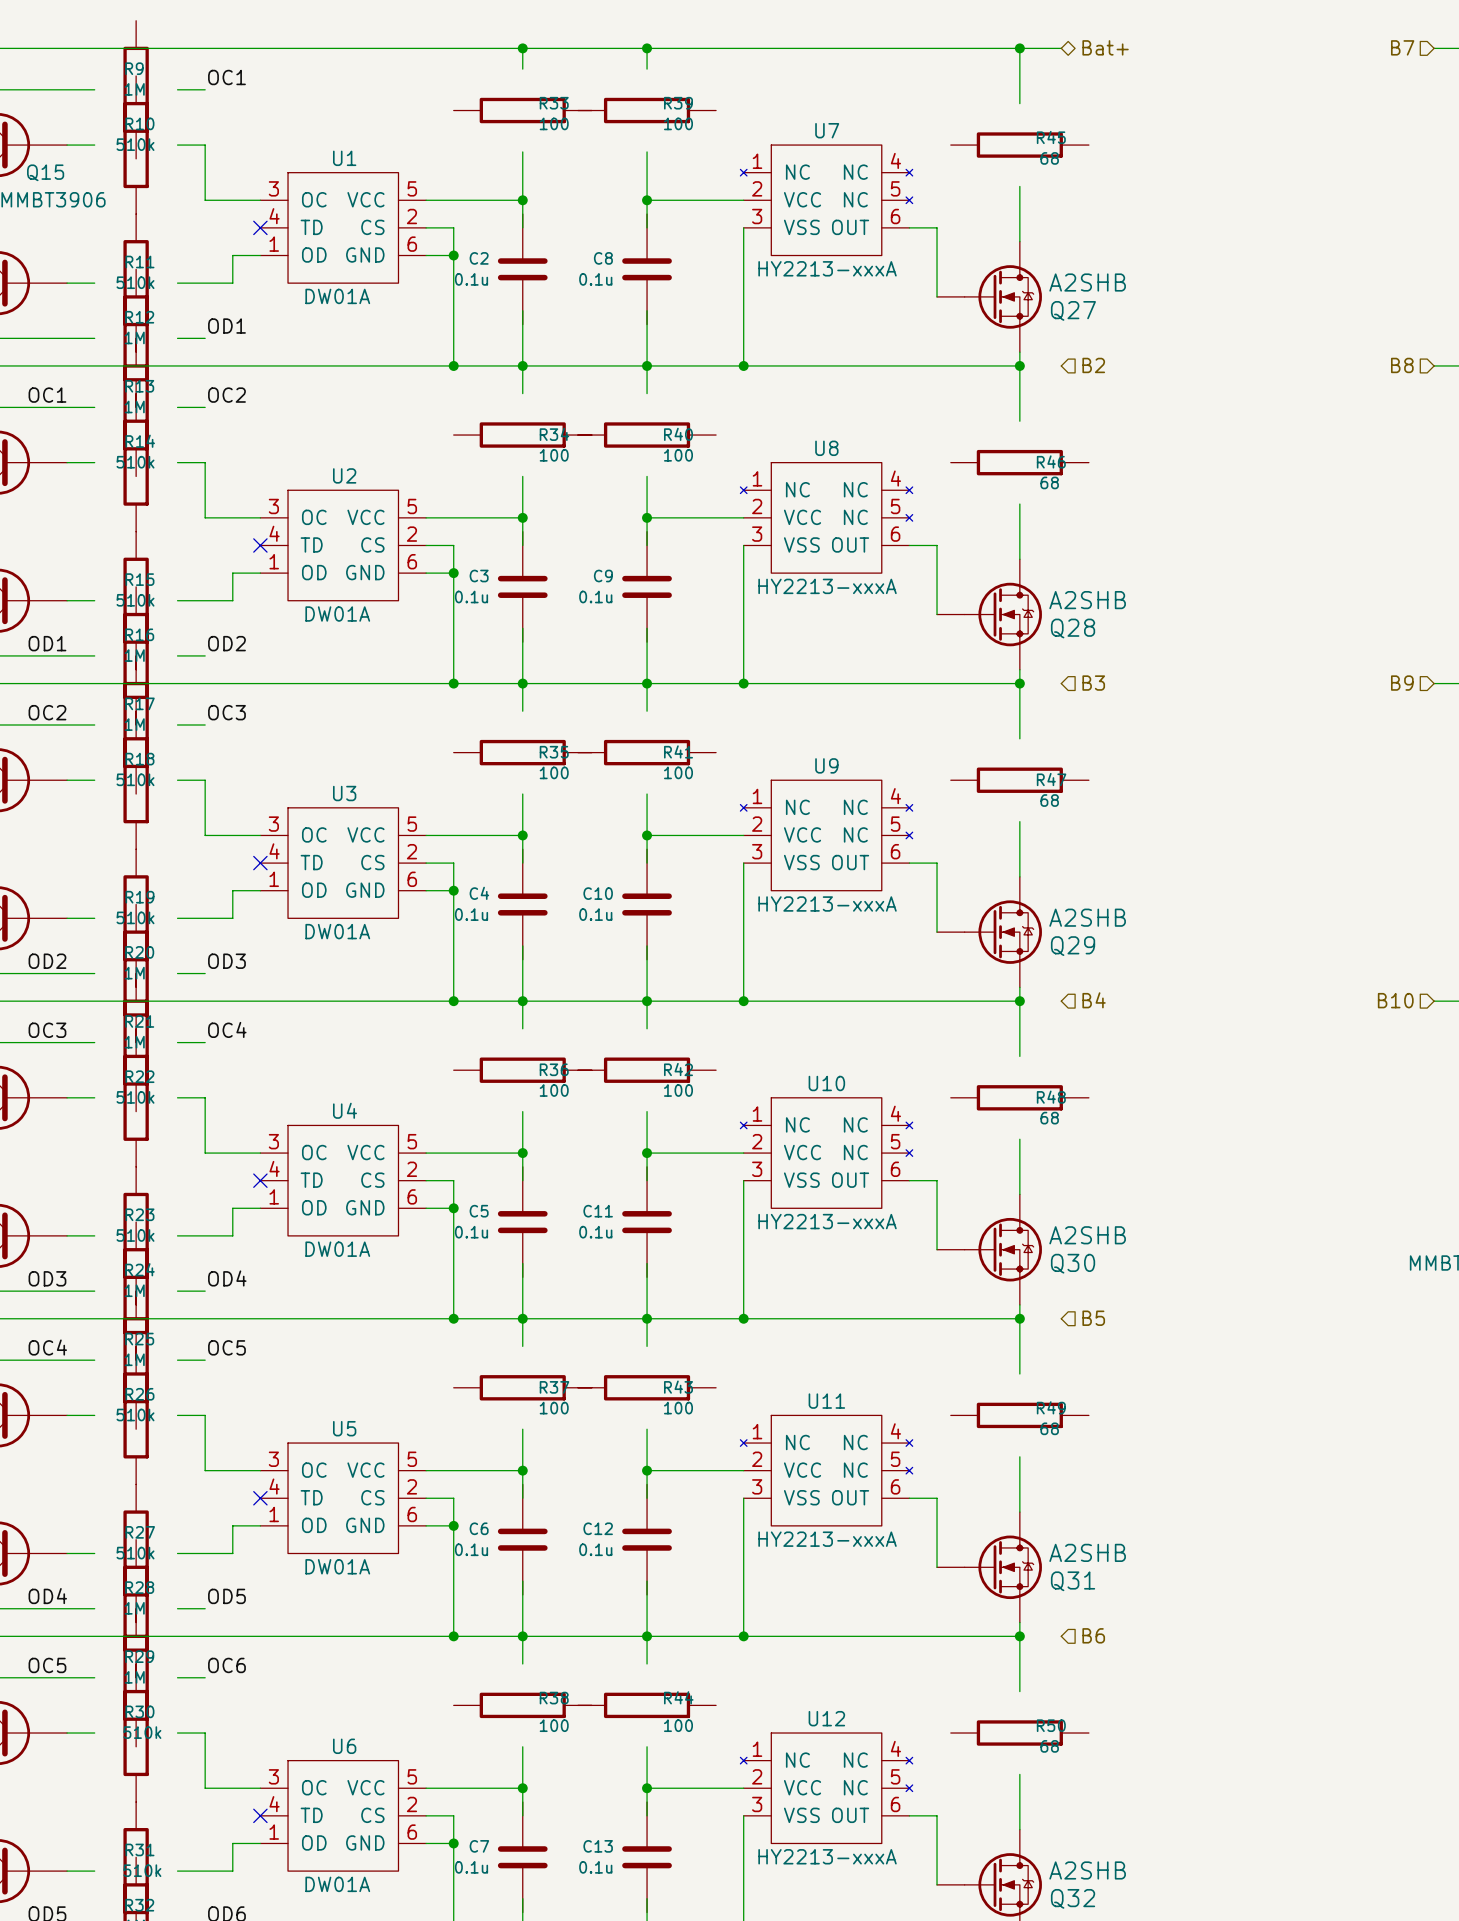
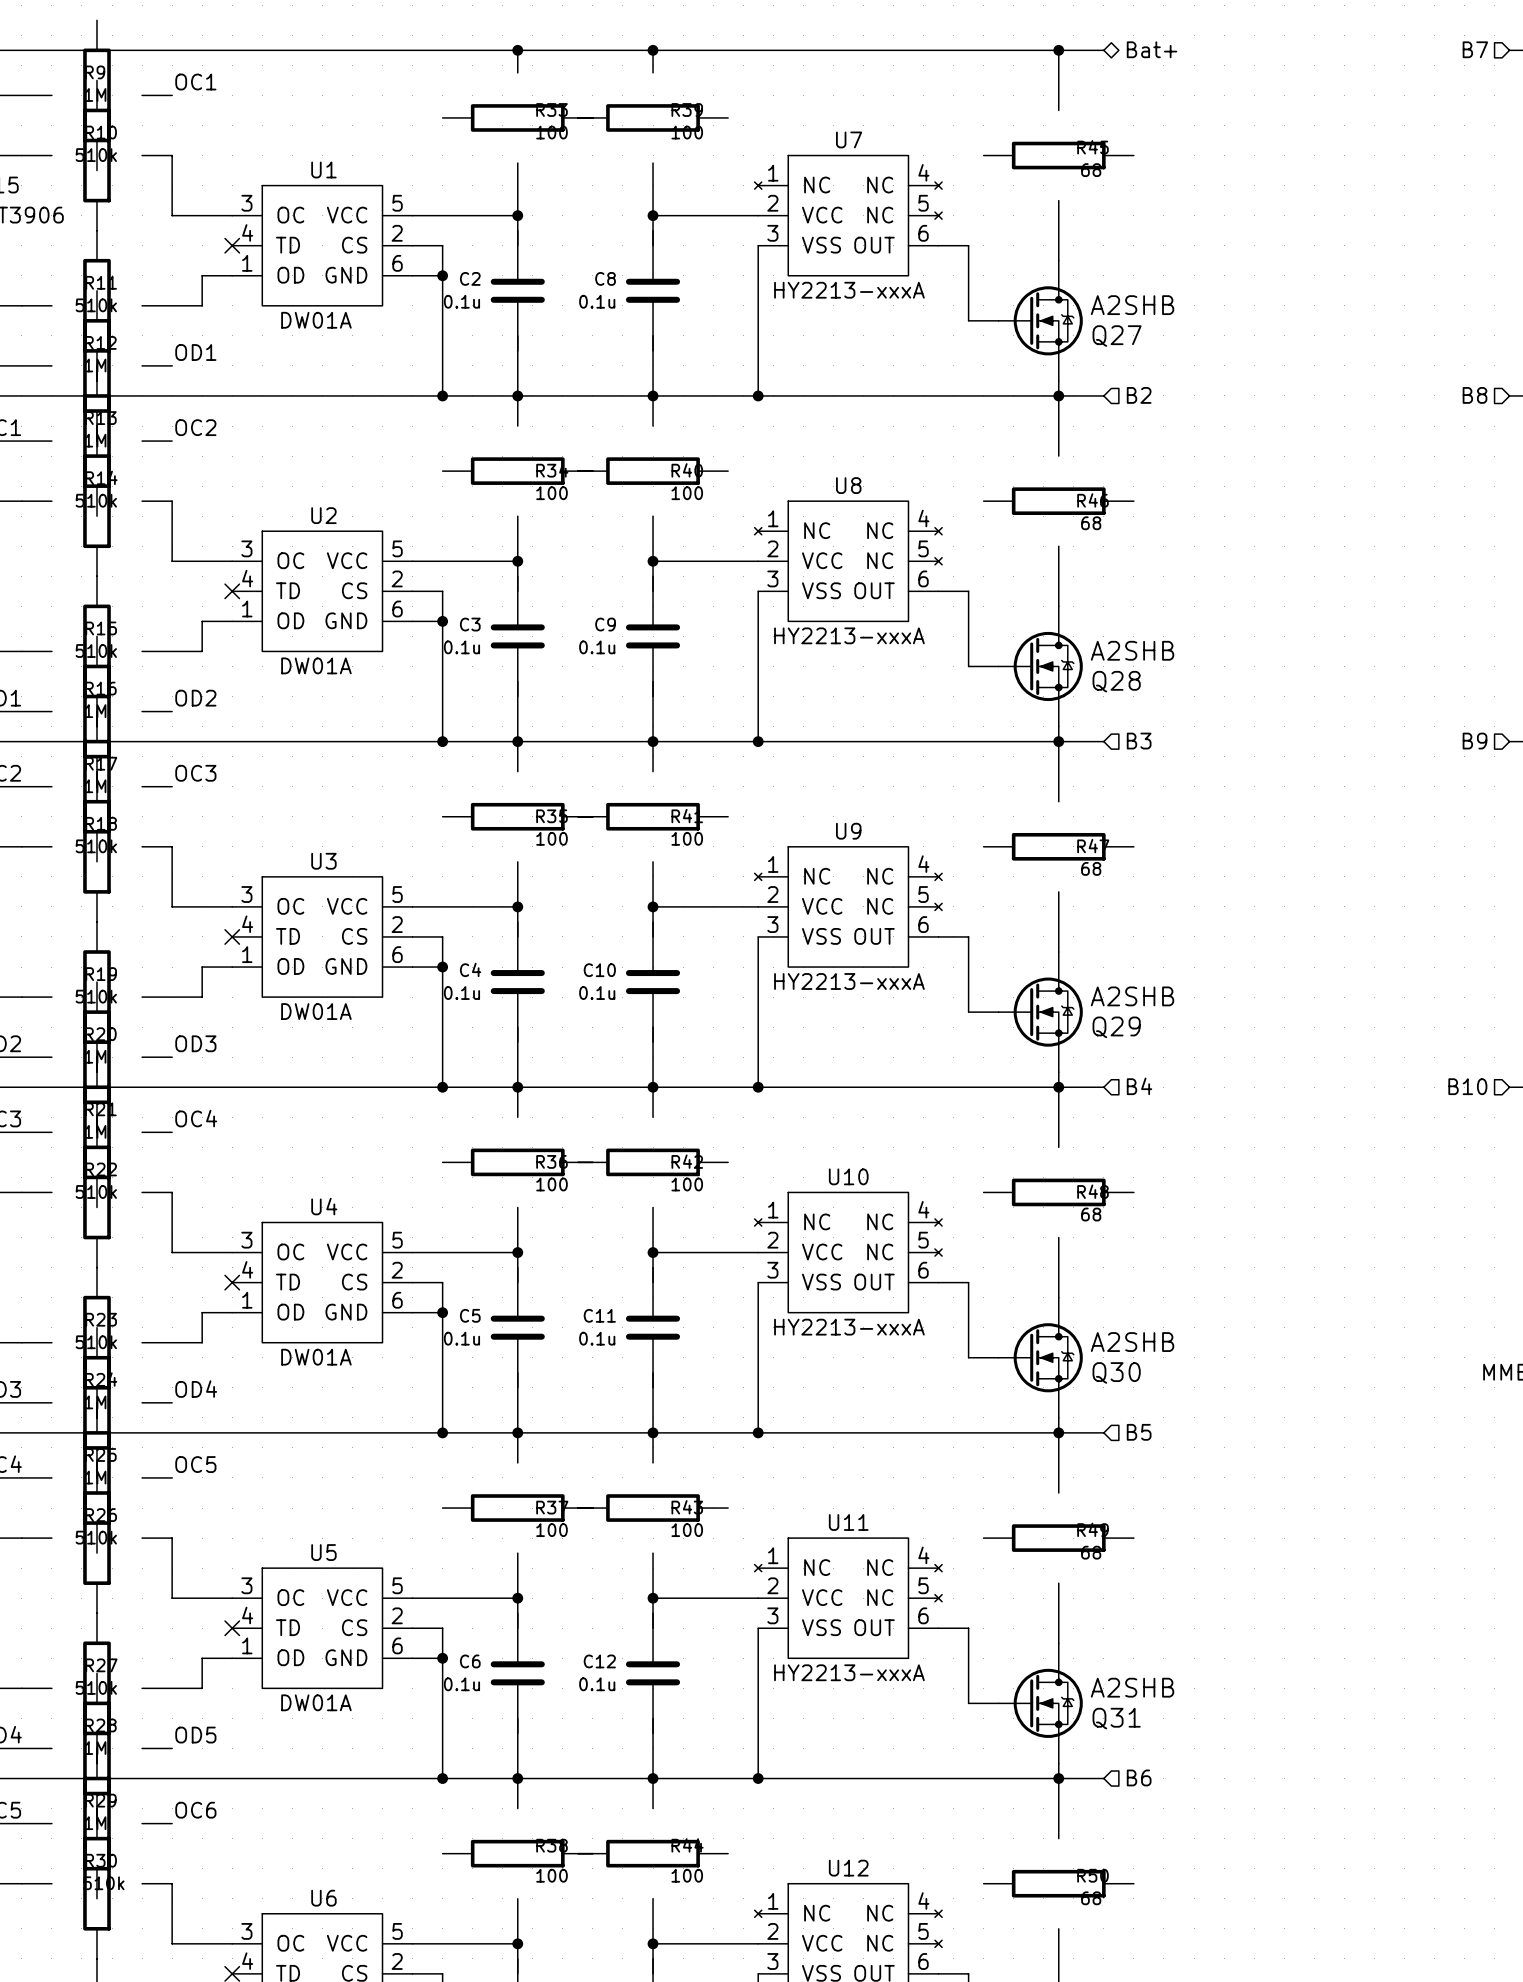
wire: none -> (1058, 395) (1103, 395)
wire: none -> (1058, 741) (1103, 741)
wire: none -> (1058, 1087) (1103, 1087)
wire: none -> (1058, 1432) (1103, 1432)
wire: none -> (1058, 1778) (1103, 1778)

